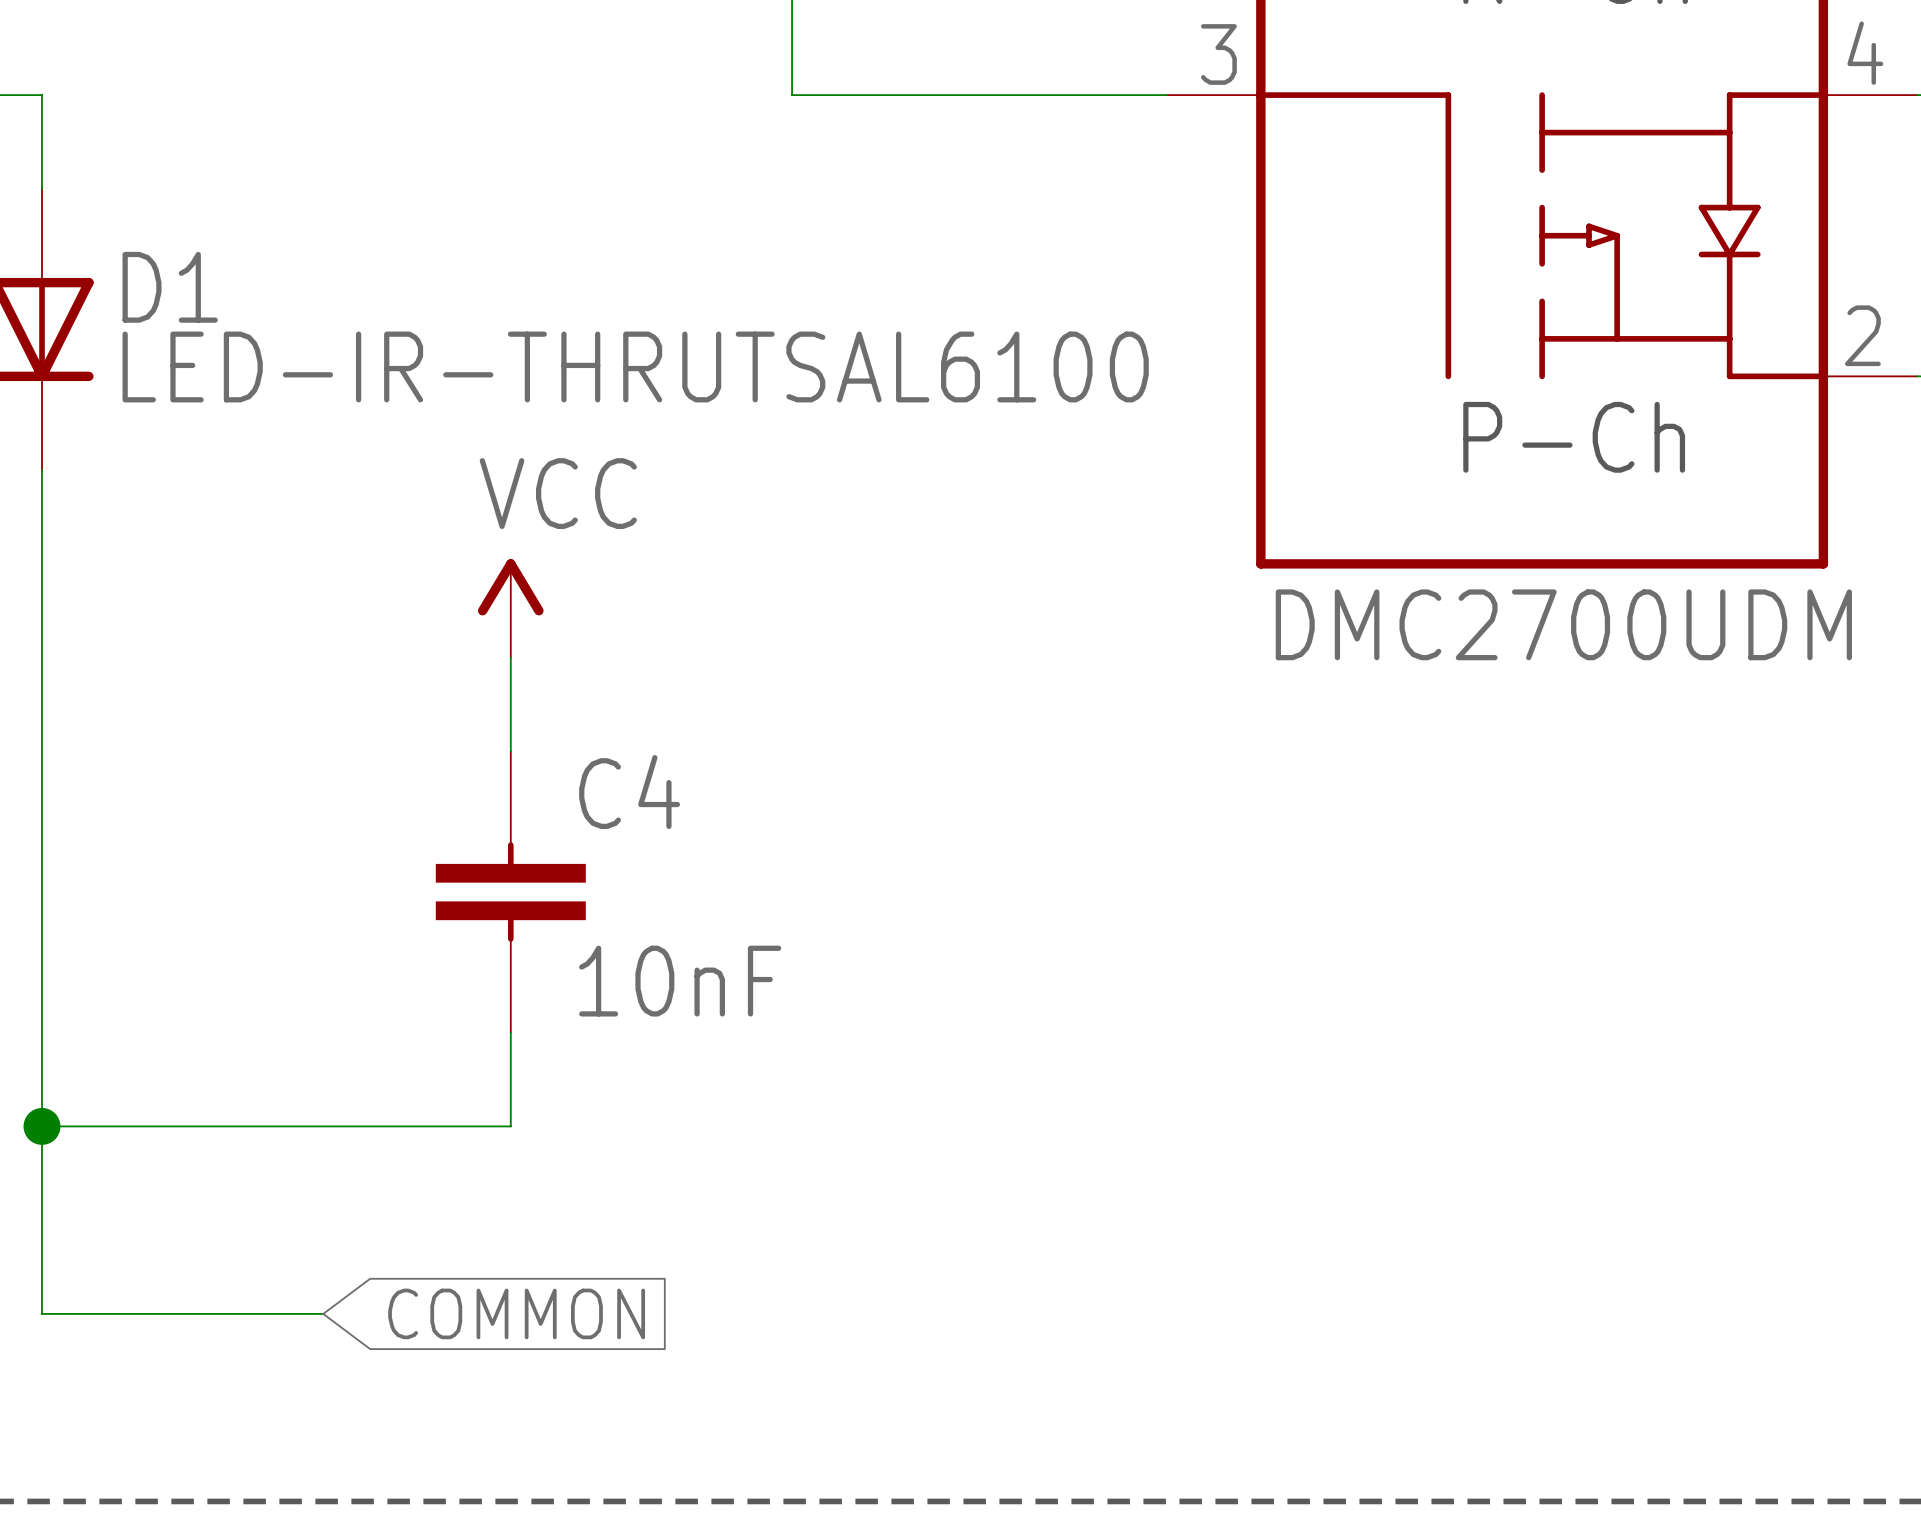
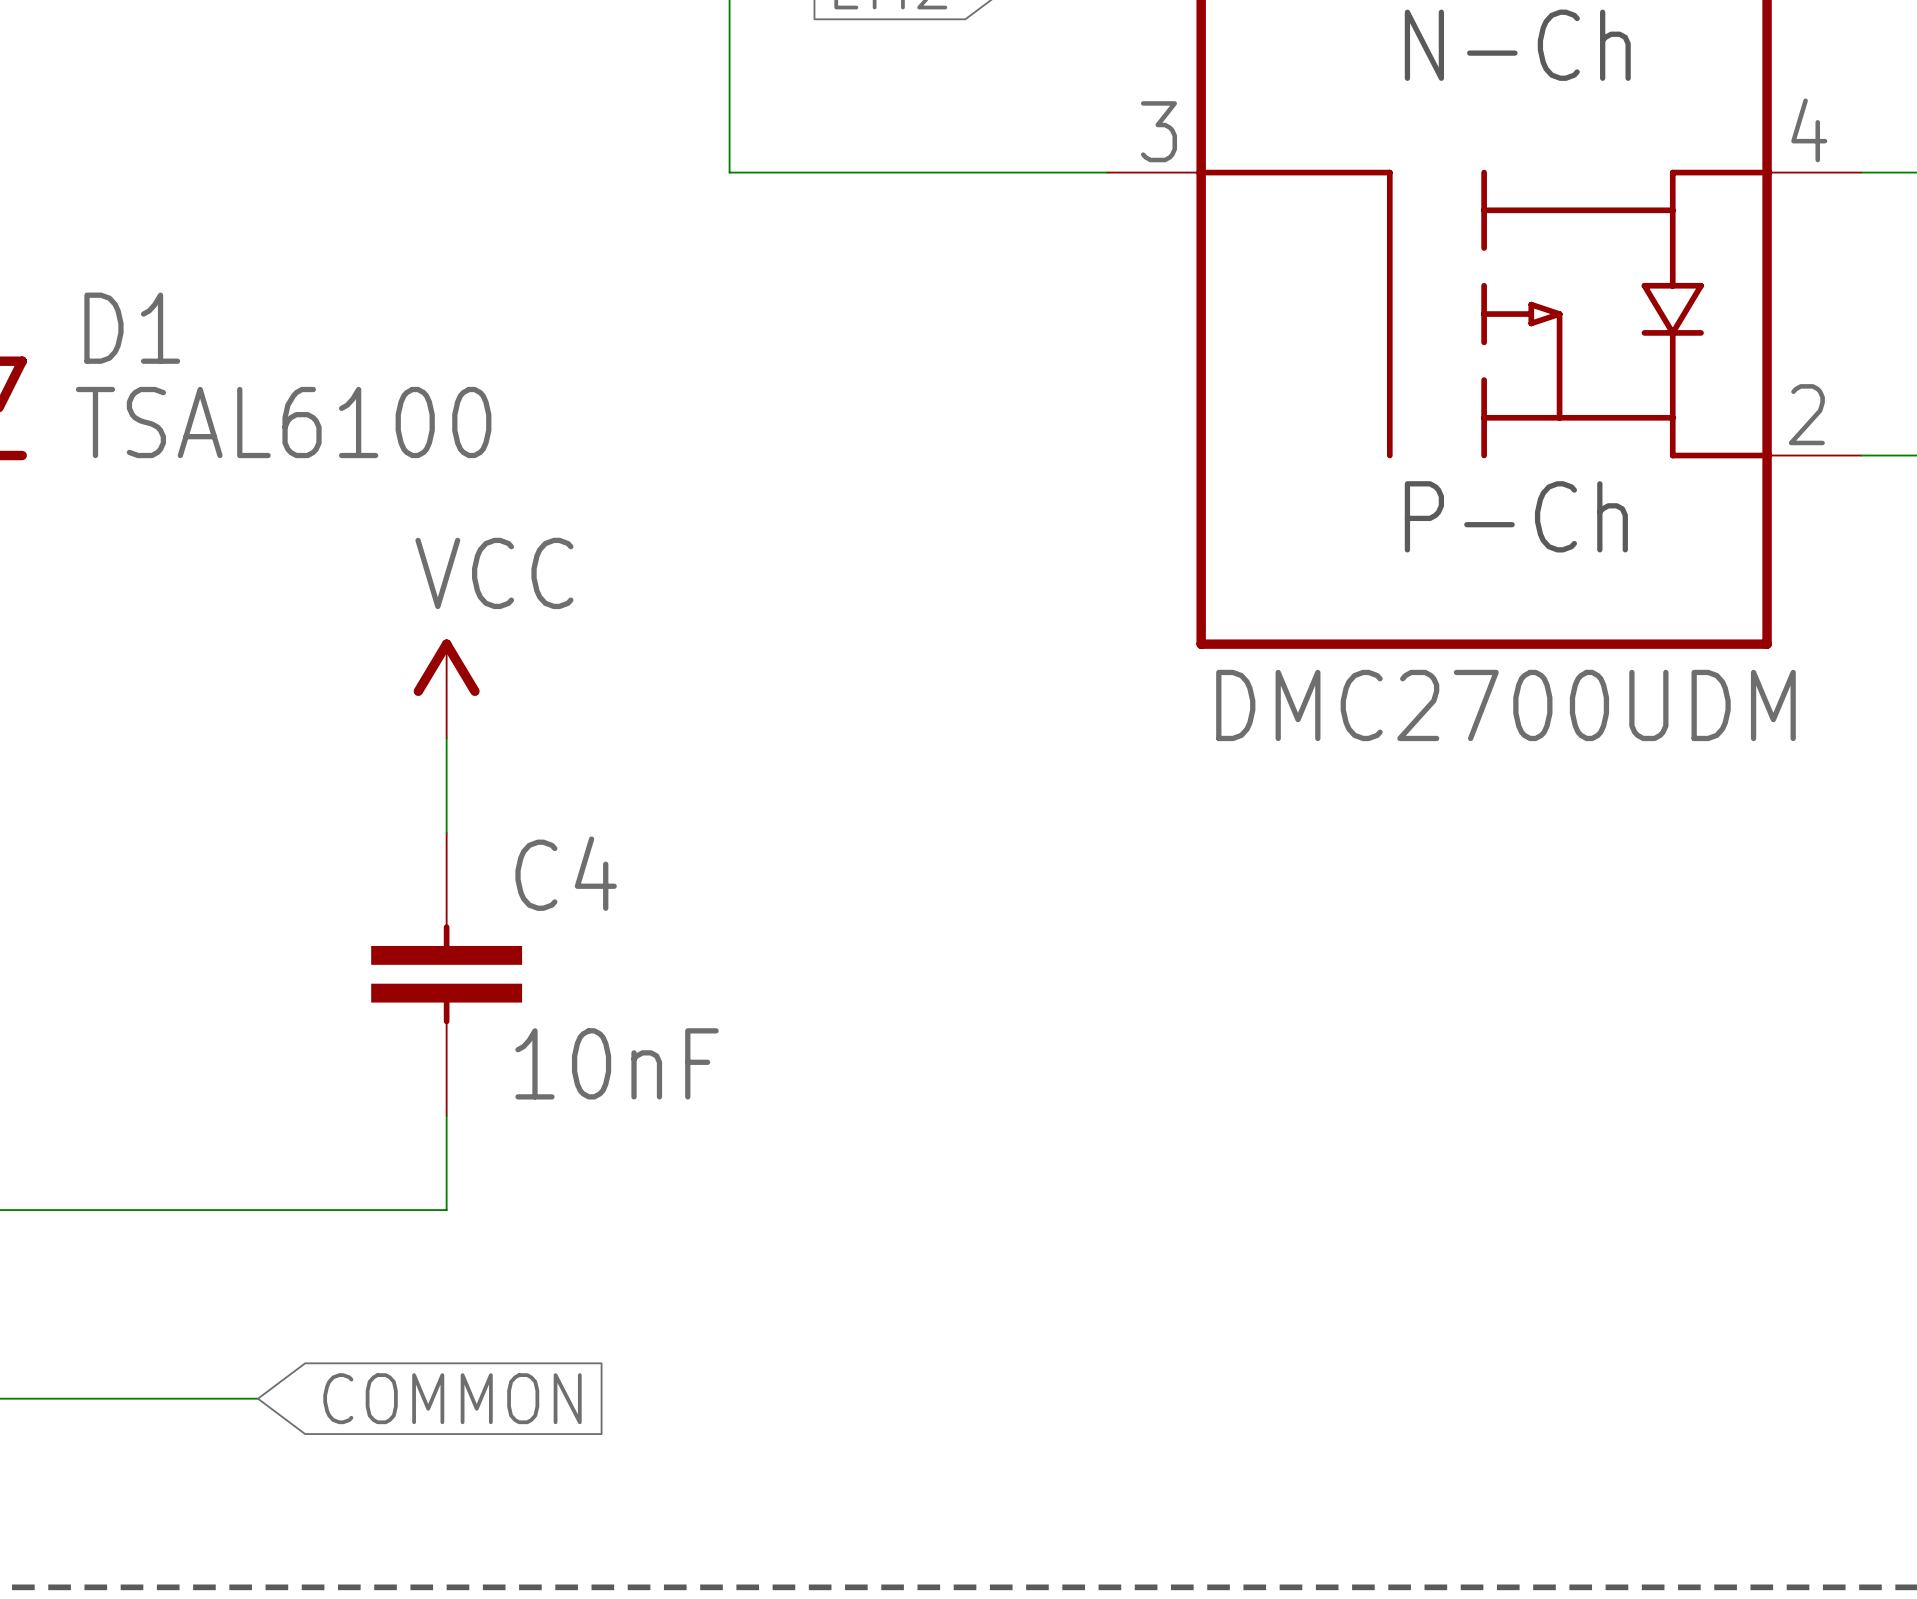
D1 name position: D1 (170, 287) -> D1 (132, 328)
D1 text: none -> TSAL6100 (283, 422)
D1 value: LED-IR-THRUTSAL6100 (635, 366) -> none

